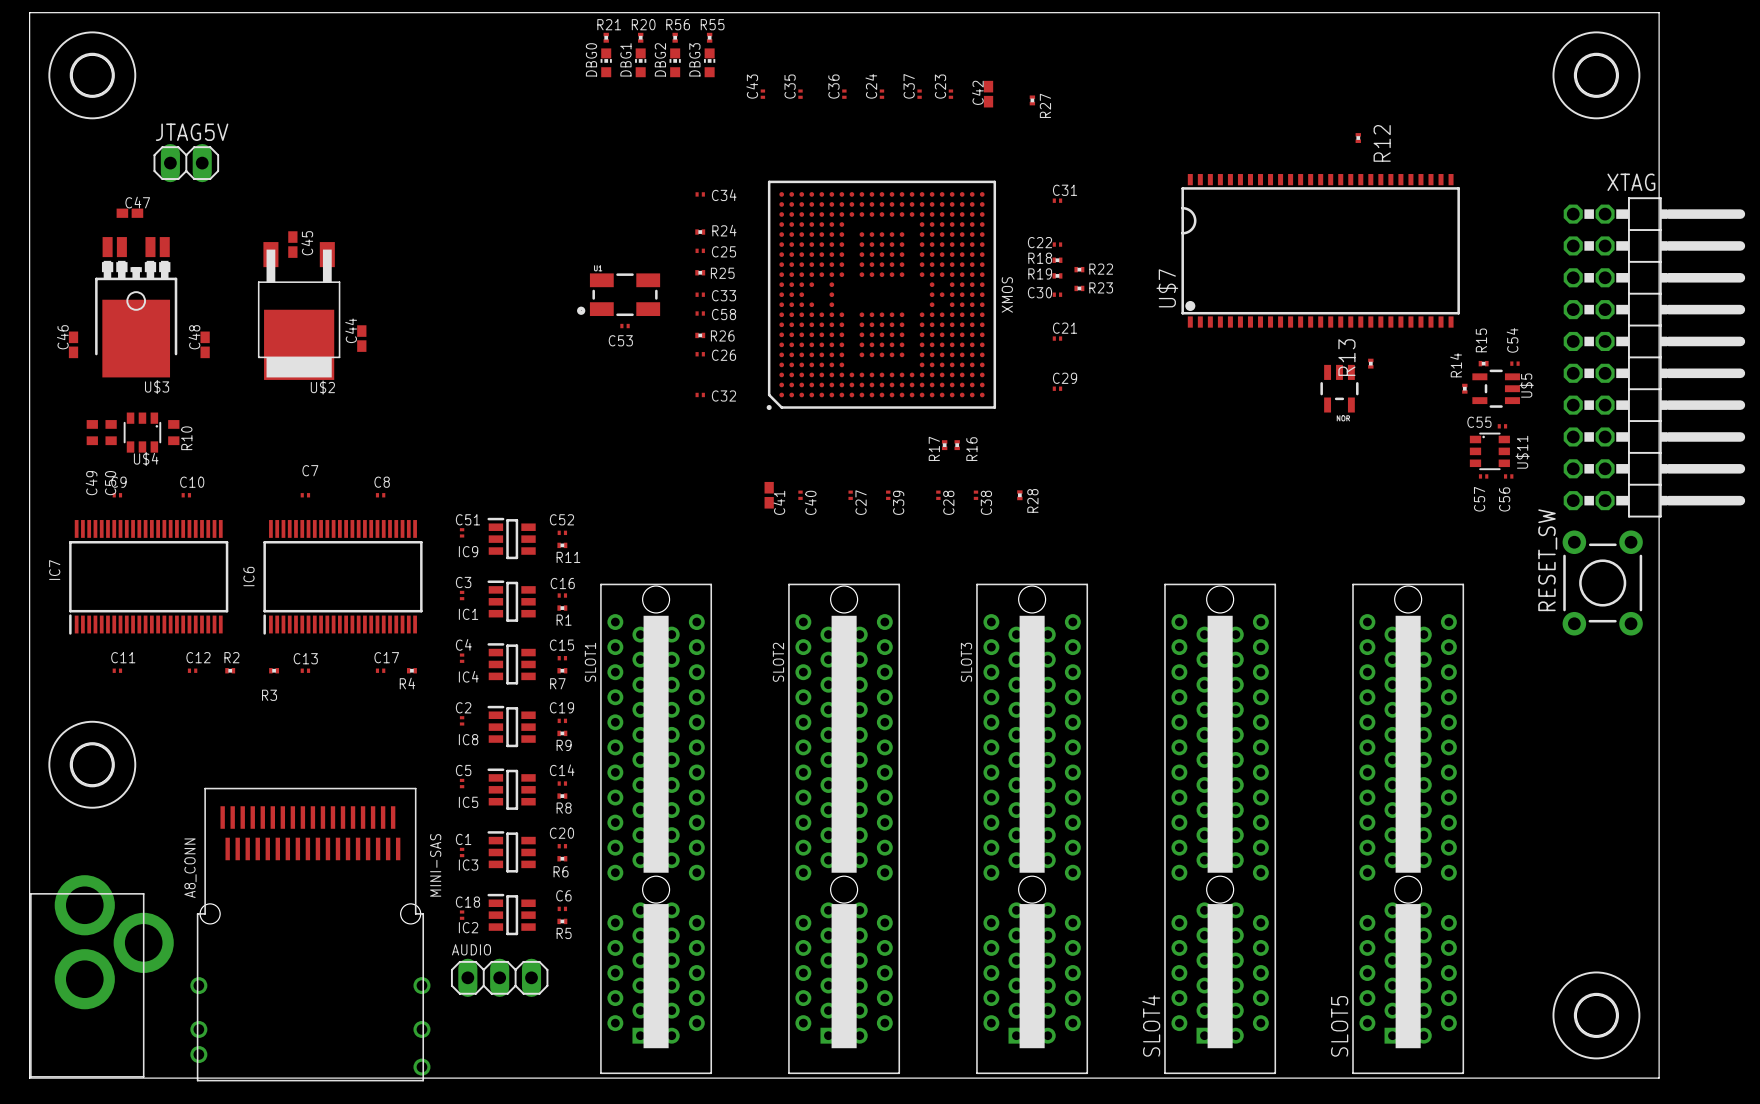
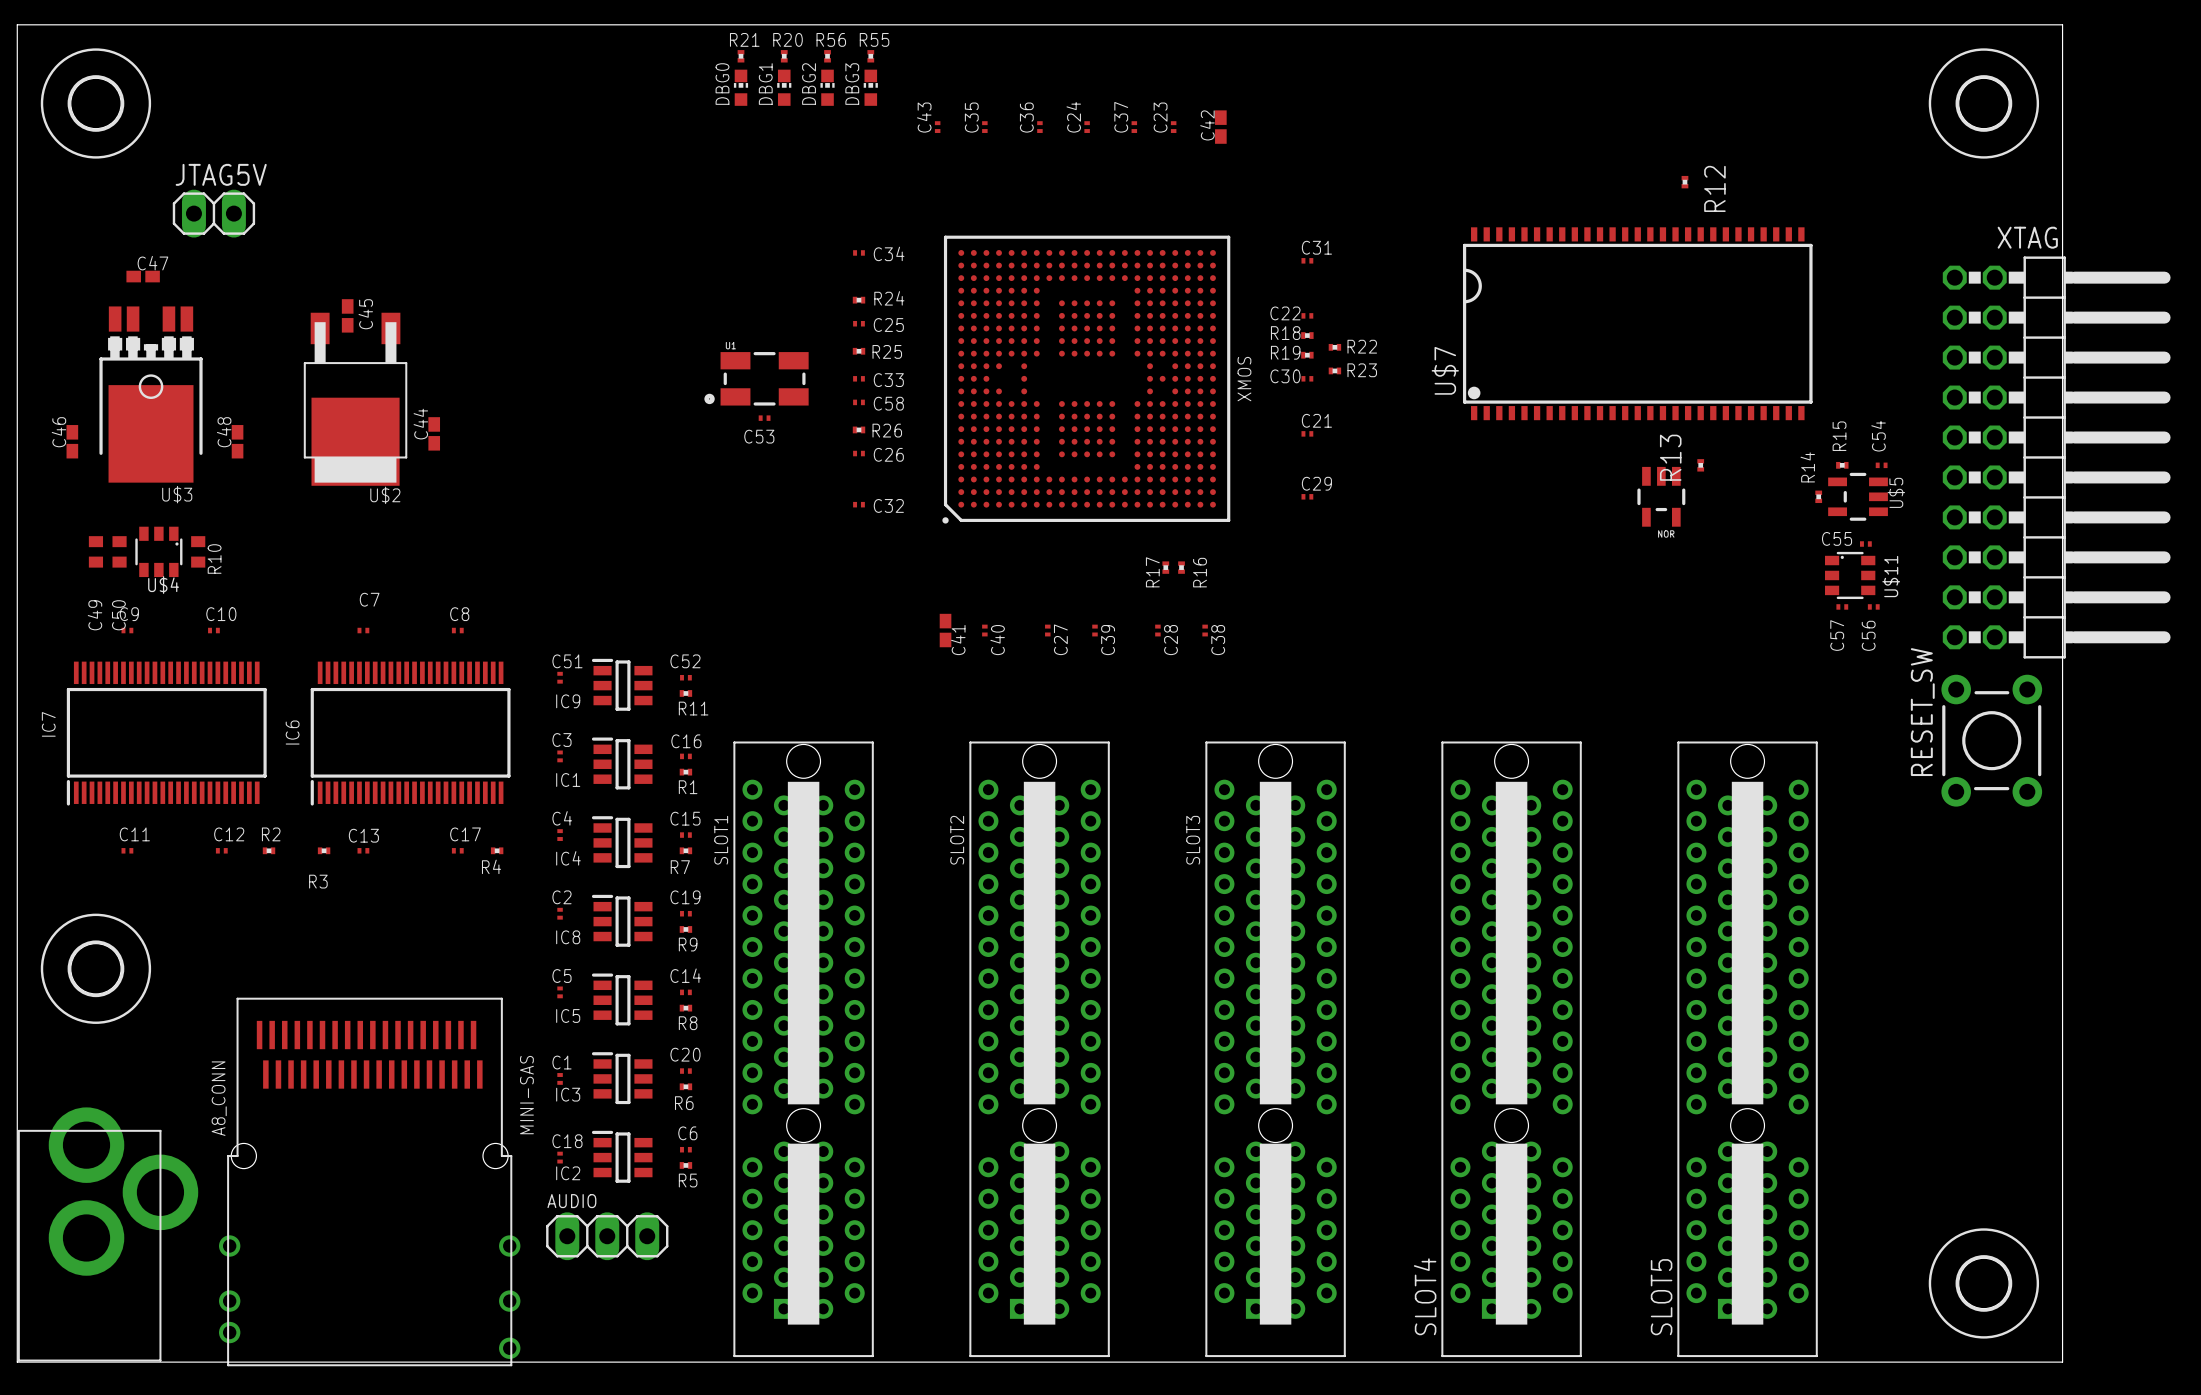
R27: (1032, 100) -> none
R28: (1019, 495) -> none

